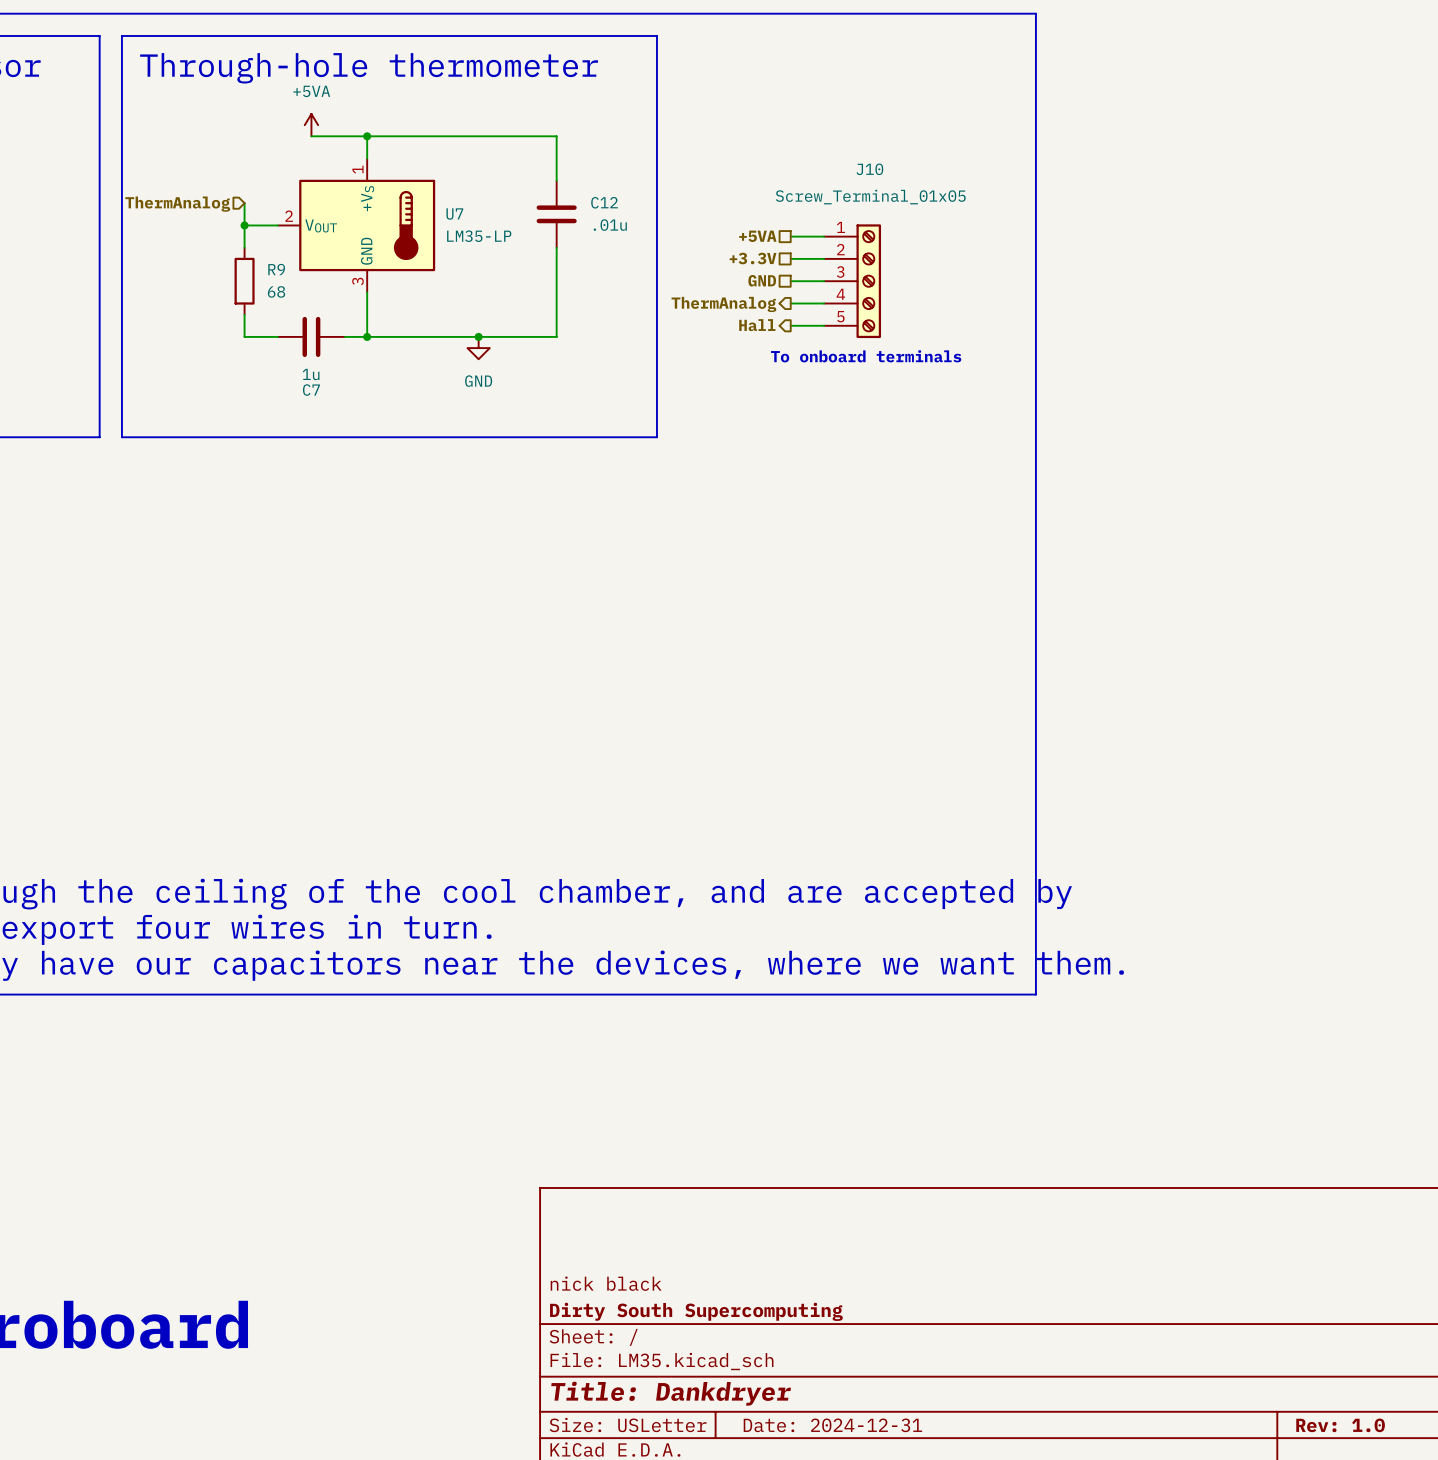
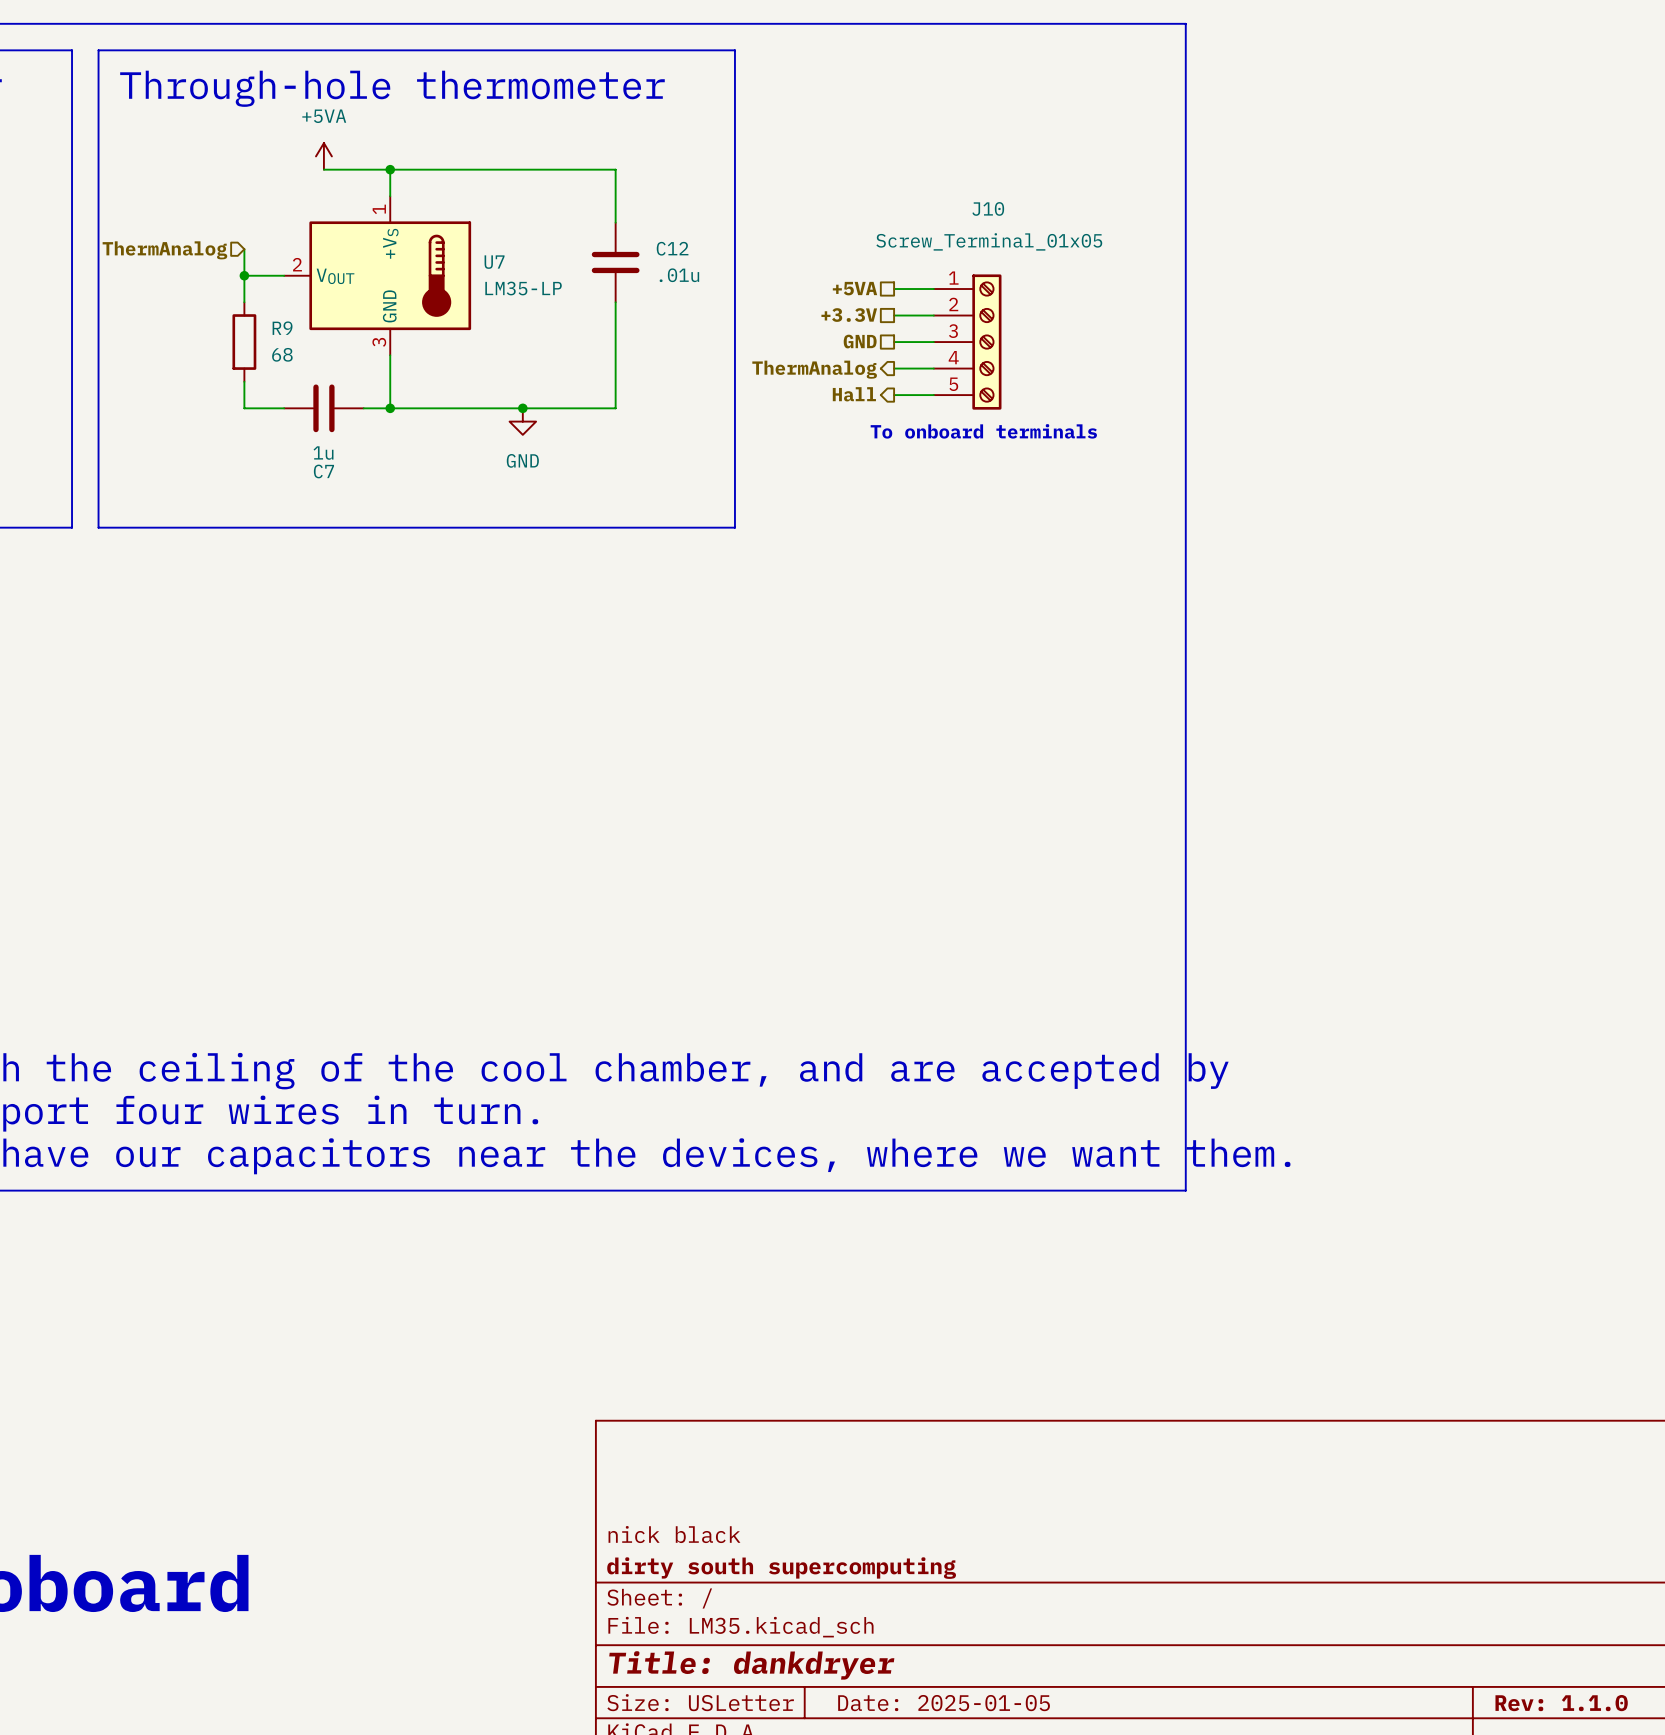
title block: Dirty South Supercomputing (696, 1311) -> dirty south supercomputing (781, 1568)
title block: Title: Dankdryer (671, 1393) -> Title: dankdryer (751, 1665)
title block: Date: 2024-12-31 (832, 1425) -> Date: 2025-01-05 (944, 1703)
title block: Rev: 1.0 (1340, 1425) -> Rev: 1.1.0 (1561, 1703)

